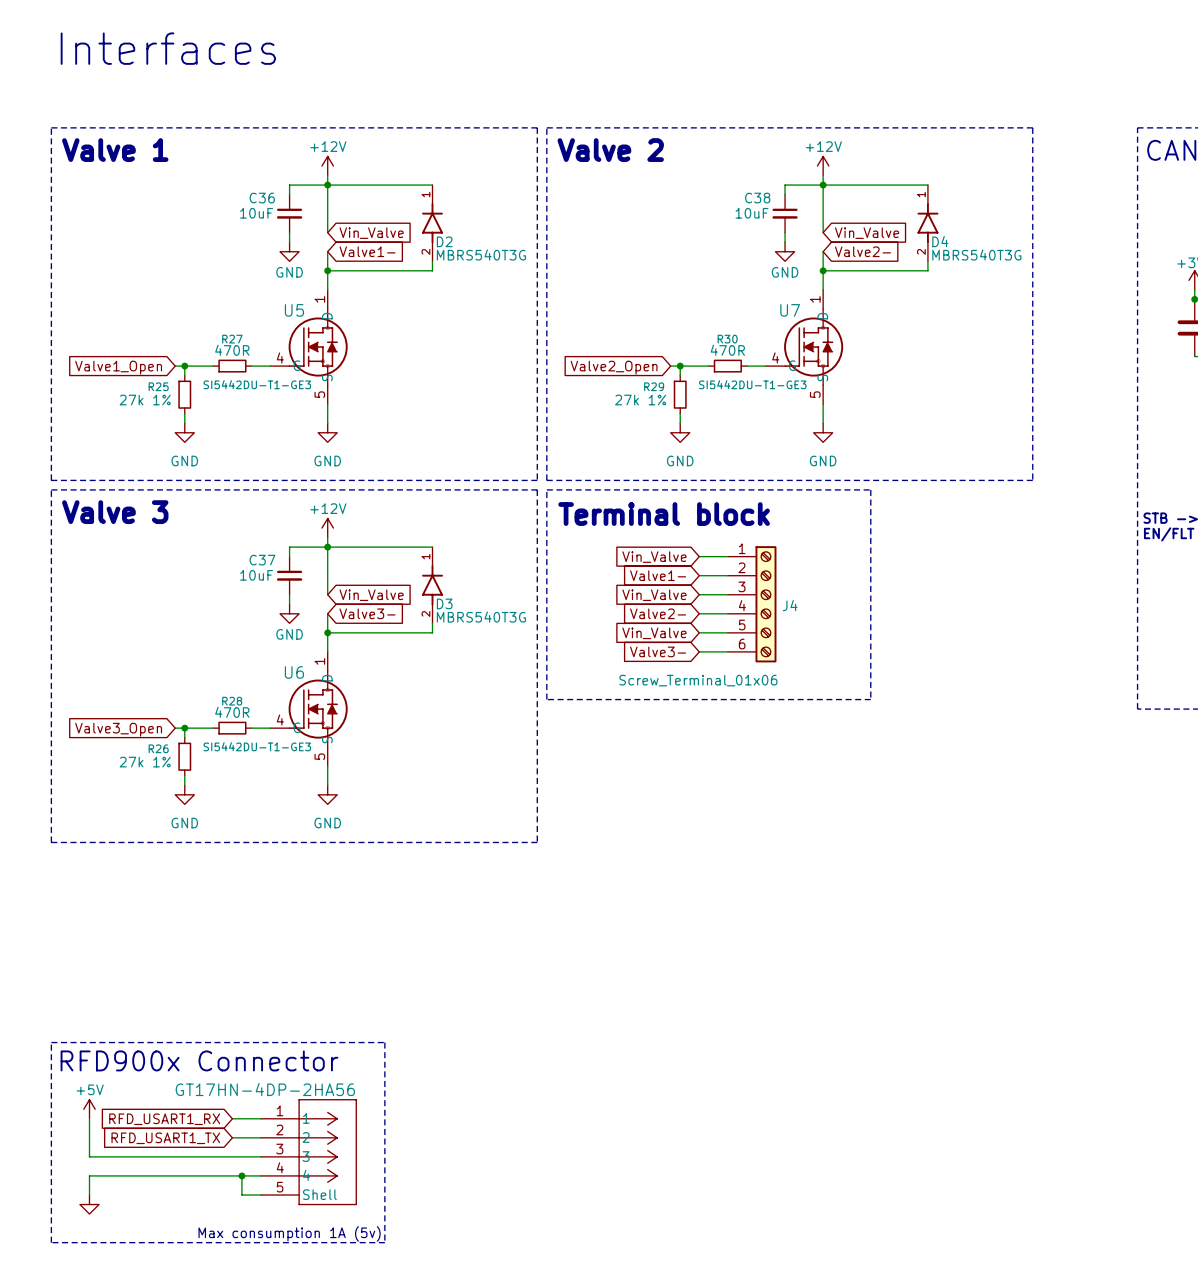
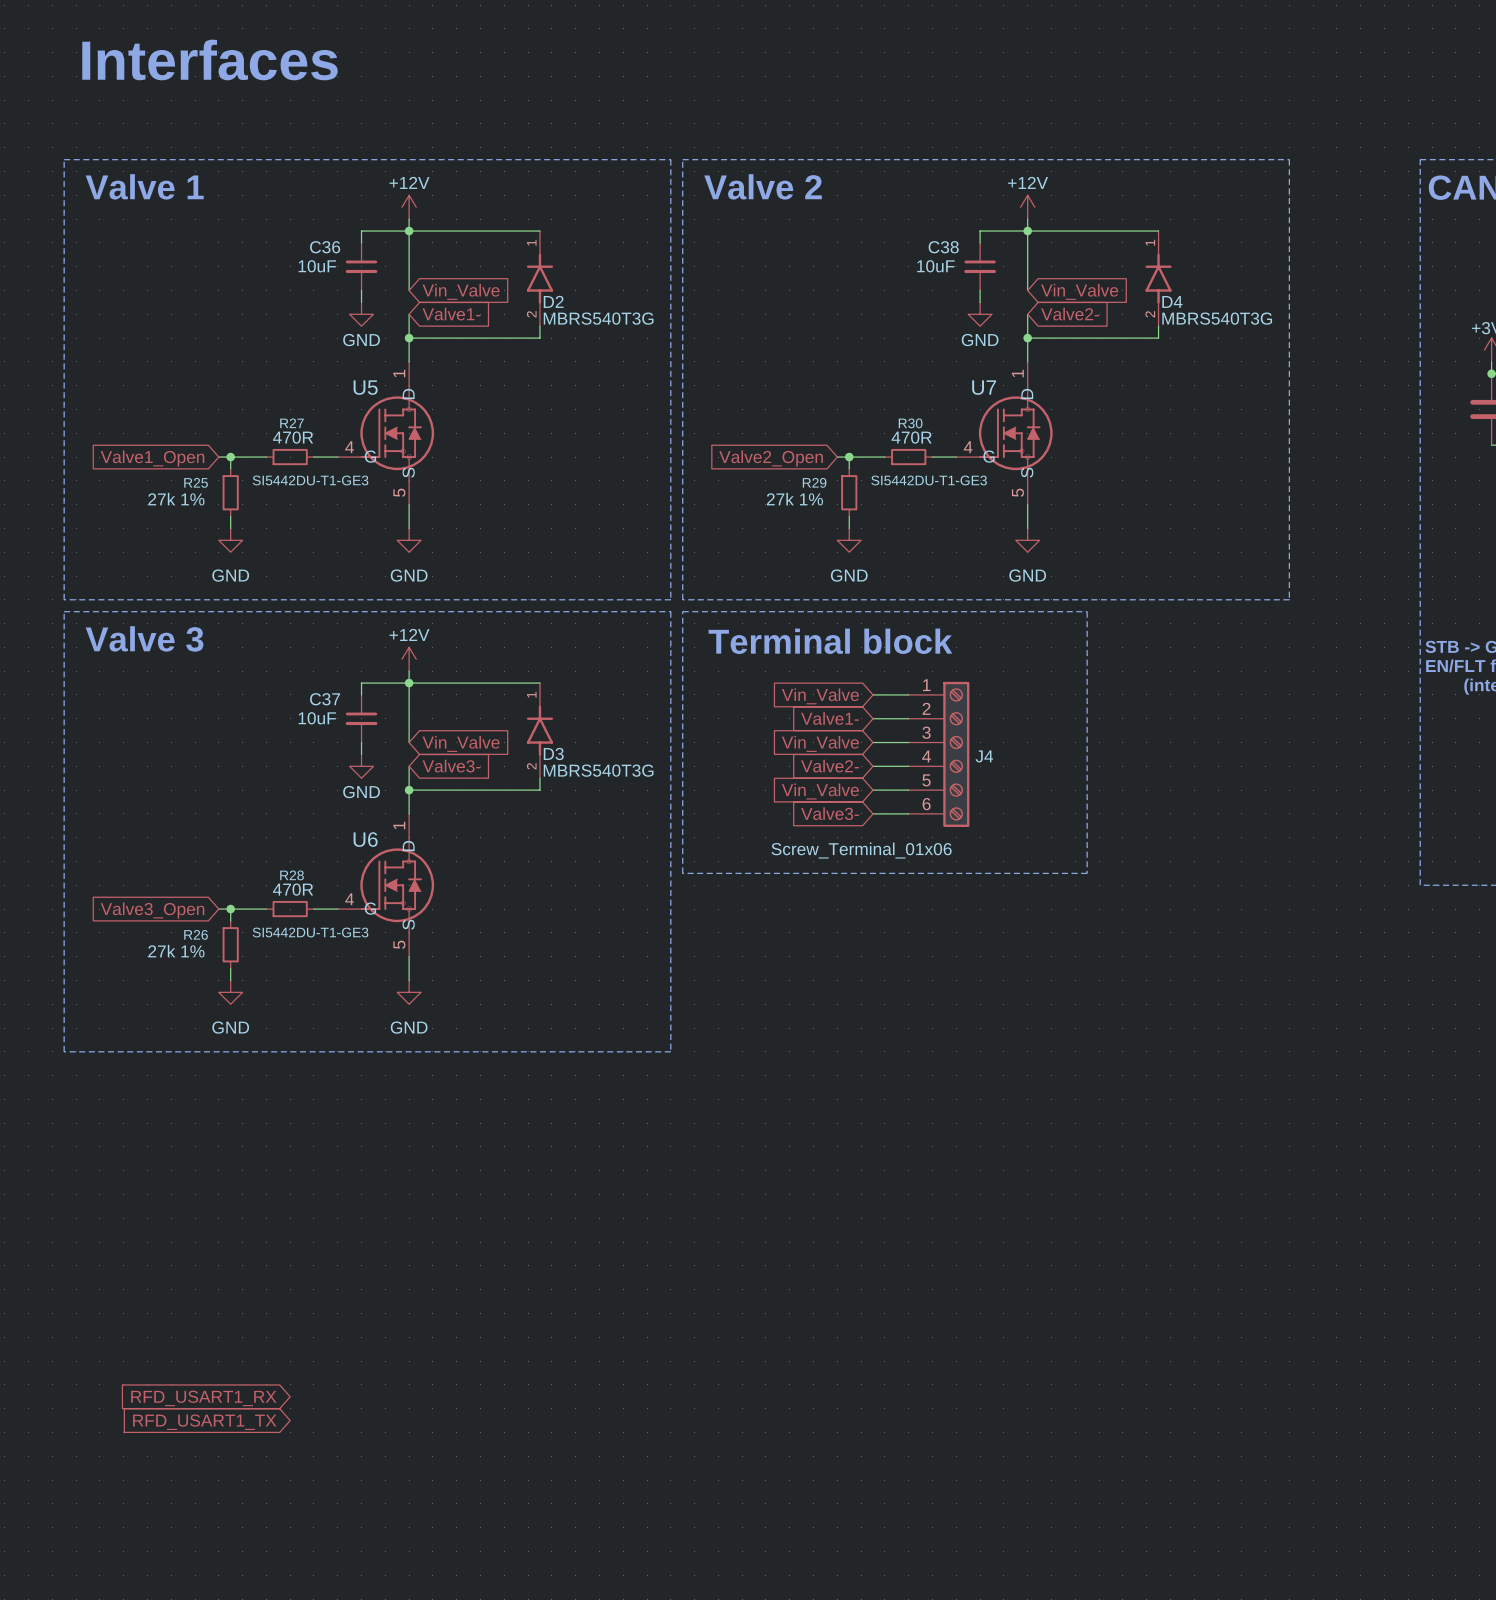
line: (51, 1042) (384, 1042) (384, 1242) (51, 1242) (51, 1042) -> none
text: RFD900x Connector (199, 1060) -> none
power symbol: +5V (89, 1109) -> none
wire: (89, 1118) (89, 1156) (260, 1156) -> none
wire: (232, 1118) (260, 1118) -> none
wire: (232, 1137) (260, 1137) -> none
part: GT17HN-4DP-2HA56 (308, 1152) -> none
wire: (241, 1175) (241, 1195) (260, 1195) -> none
junction: (241, 1175) -> none
wire: (260, 1175) (89, 1175) (89, 1195) -> none
power symbol: (89, 1204) -> none
text: Max consumption 1A (5v) (289, 1233) -> none

